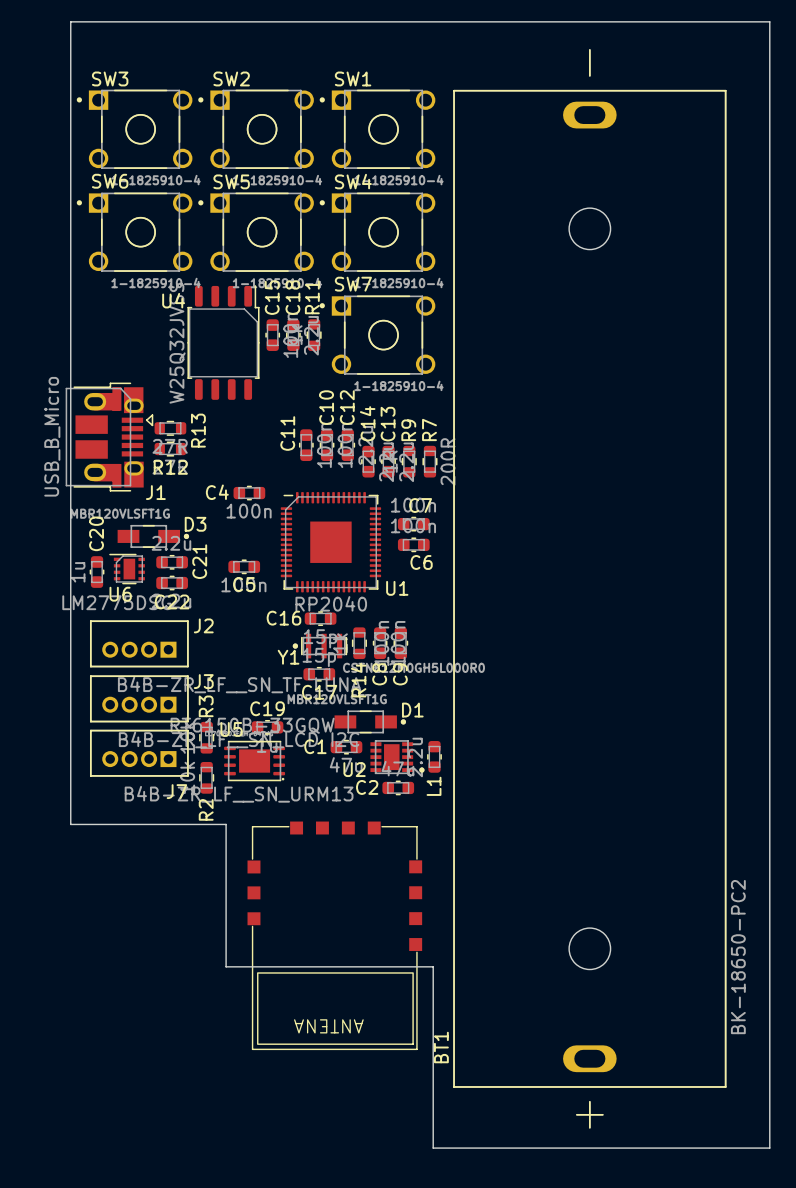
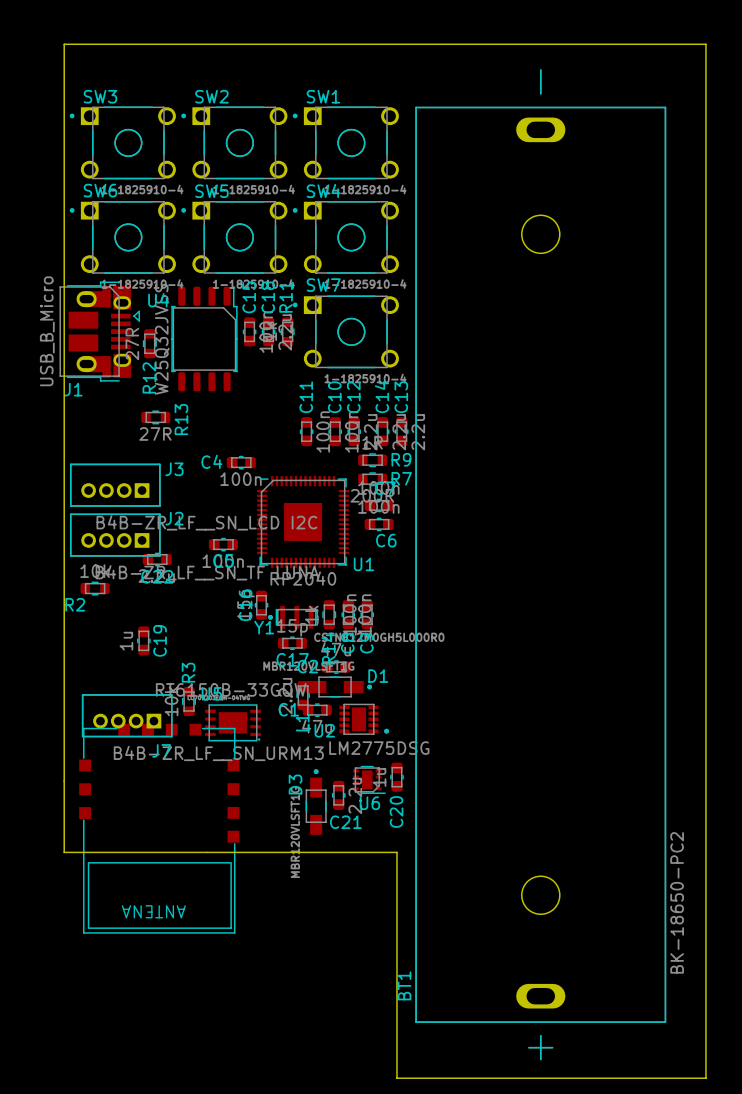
C11 name position: C11 (287, 433) -> C11 (306, 397)
J1 position: (109, 437) -> (99, 331)
C11 position: (306, 445) -> (306, 431)
C10 position: (327, 445) -> (335, 431)
C12 position: (347, 445) -> (354, 431)
R12 rotation: 0° (170, 449) -> 90° clockwise (149, 343)
R12 position: (170, 449) -> (149, 343)
C14 position: (368, 461) -> (382, 431)
C13 position: (388, 461) -> (401, 431)
R9 rotation: 0° (409, 461) -> 90° clockwise (372, 460)
R7 rotation: 0° (429, 461) -> 90° clockwise (372, 479)
R7 position: (429, 461) -> (372, 479)
J1 name position: J1 (155, 492) -> J1 (73, 389)
C4 position: (249, 493) -> (241, 462)
C20 name position: C20 (96, 533) -> C20 (396, 812)
D3 rotation: 0° (153, 536) -> 90° counterclockwise (316, 802)
D3 position: (153, 536) -> (316, 802)
C21 rotation: 0° (172, 562) -> 90° clockwise (338, 795)
C21 position: (172, 562) -> (338, 795)
U6 rotation: 0° (127, 569) -> 180° (369, 779)
U6 position: (127, 569) -> (369, 779)
C20 position: (97, 572) -> (396, 777)
C16 rotation: 0° (320, 618) -> 90° clockwise (261, 605)
C16 position: (320, 618) -> (261, 605)
J2 position: (139, 643) -> (115, 535)
J3 position: (139, 698) -> (115, 485)
C19 rotation: 0° (267, 727) -> 90° clockwise (143, 640)
C19 position: (267, 727) -> (143, 640)
L1 position: (434, 756) -> (303, 695)
R2 rotation: 0° (206, 777) -> 90° clockwise (95, 588)
R2 position: (206, 777) -> (95, 588)
C2 position: (398, 787) -> (336, 667)
board edge: (70, 824) (226, 824) (226, 966) (433, 966) -> (64, 781) (64, 852) (396, 852) (396, 911)
part position: (334, 935) -> (159, 828)

